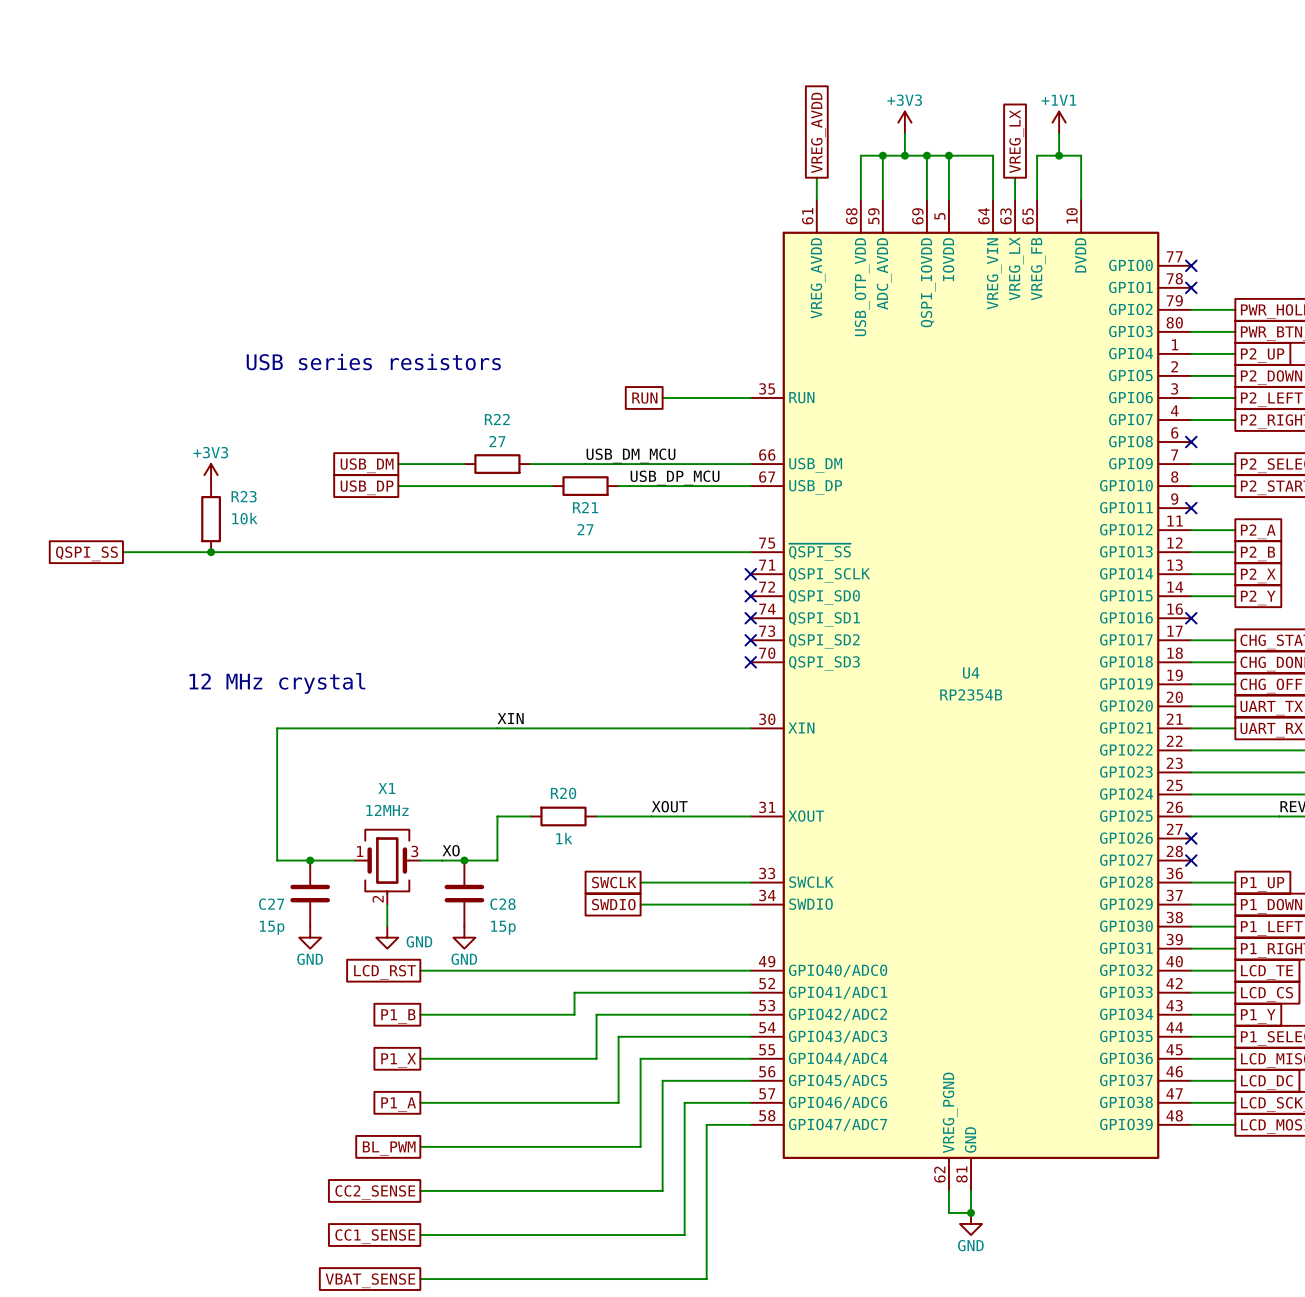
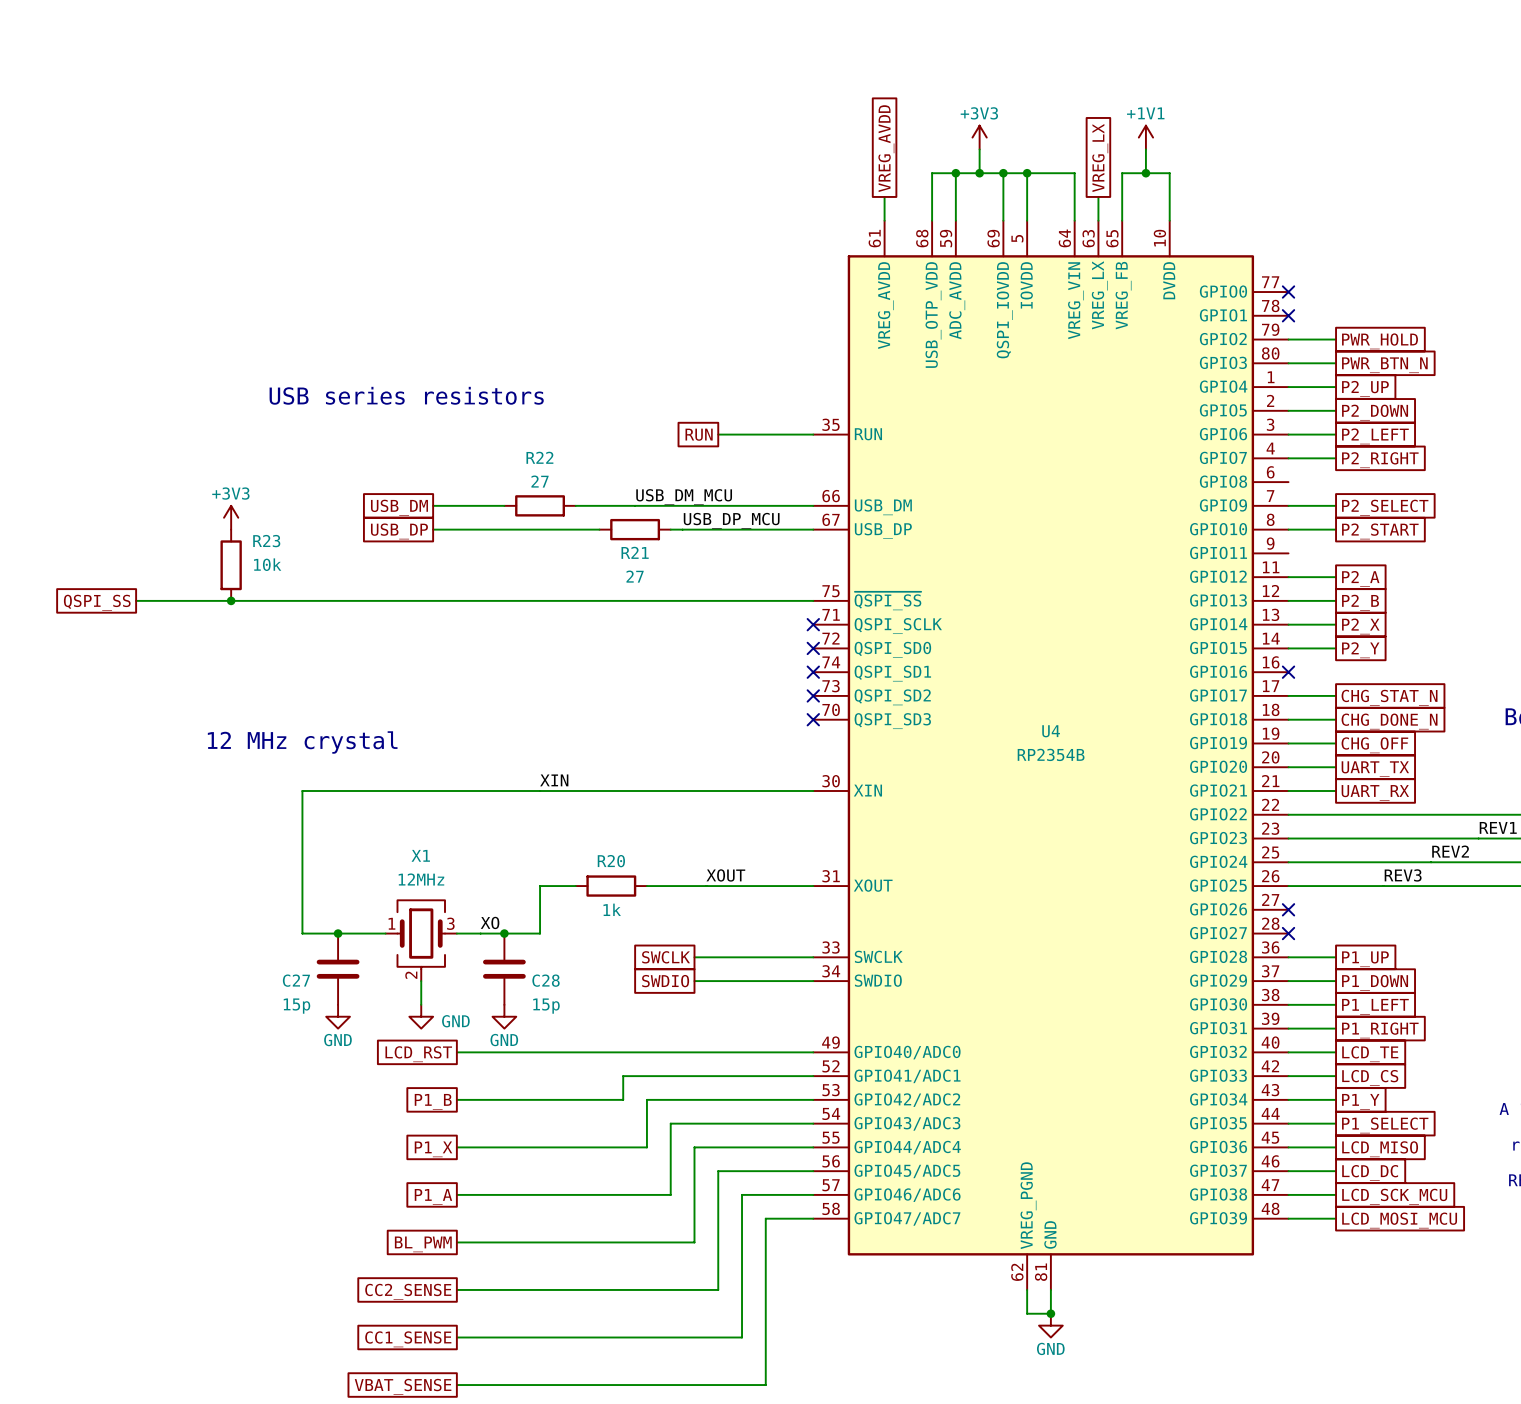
no-connect mark: (1191, 442) -> none
no-connect mark: (1191, 508) -> none

